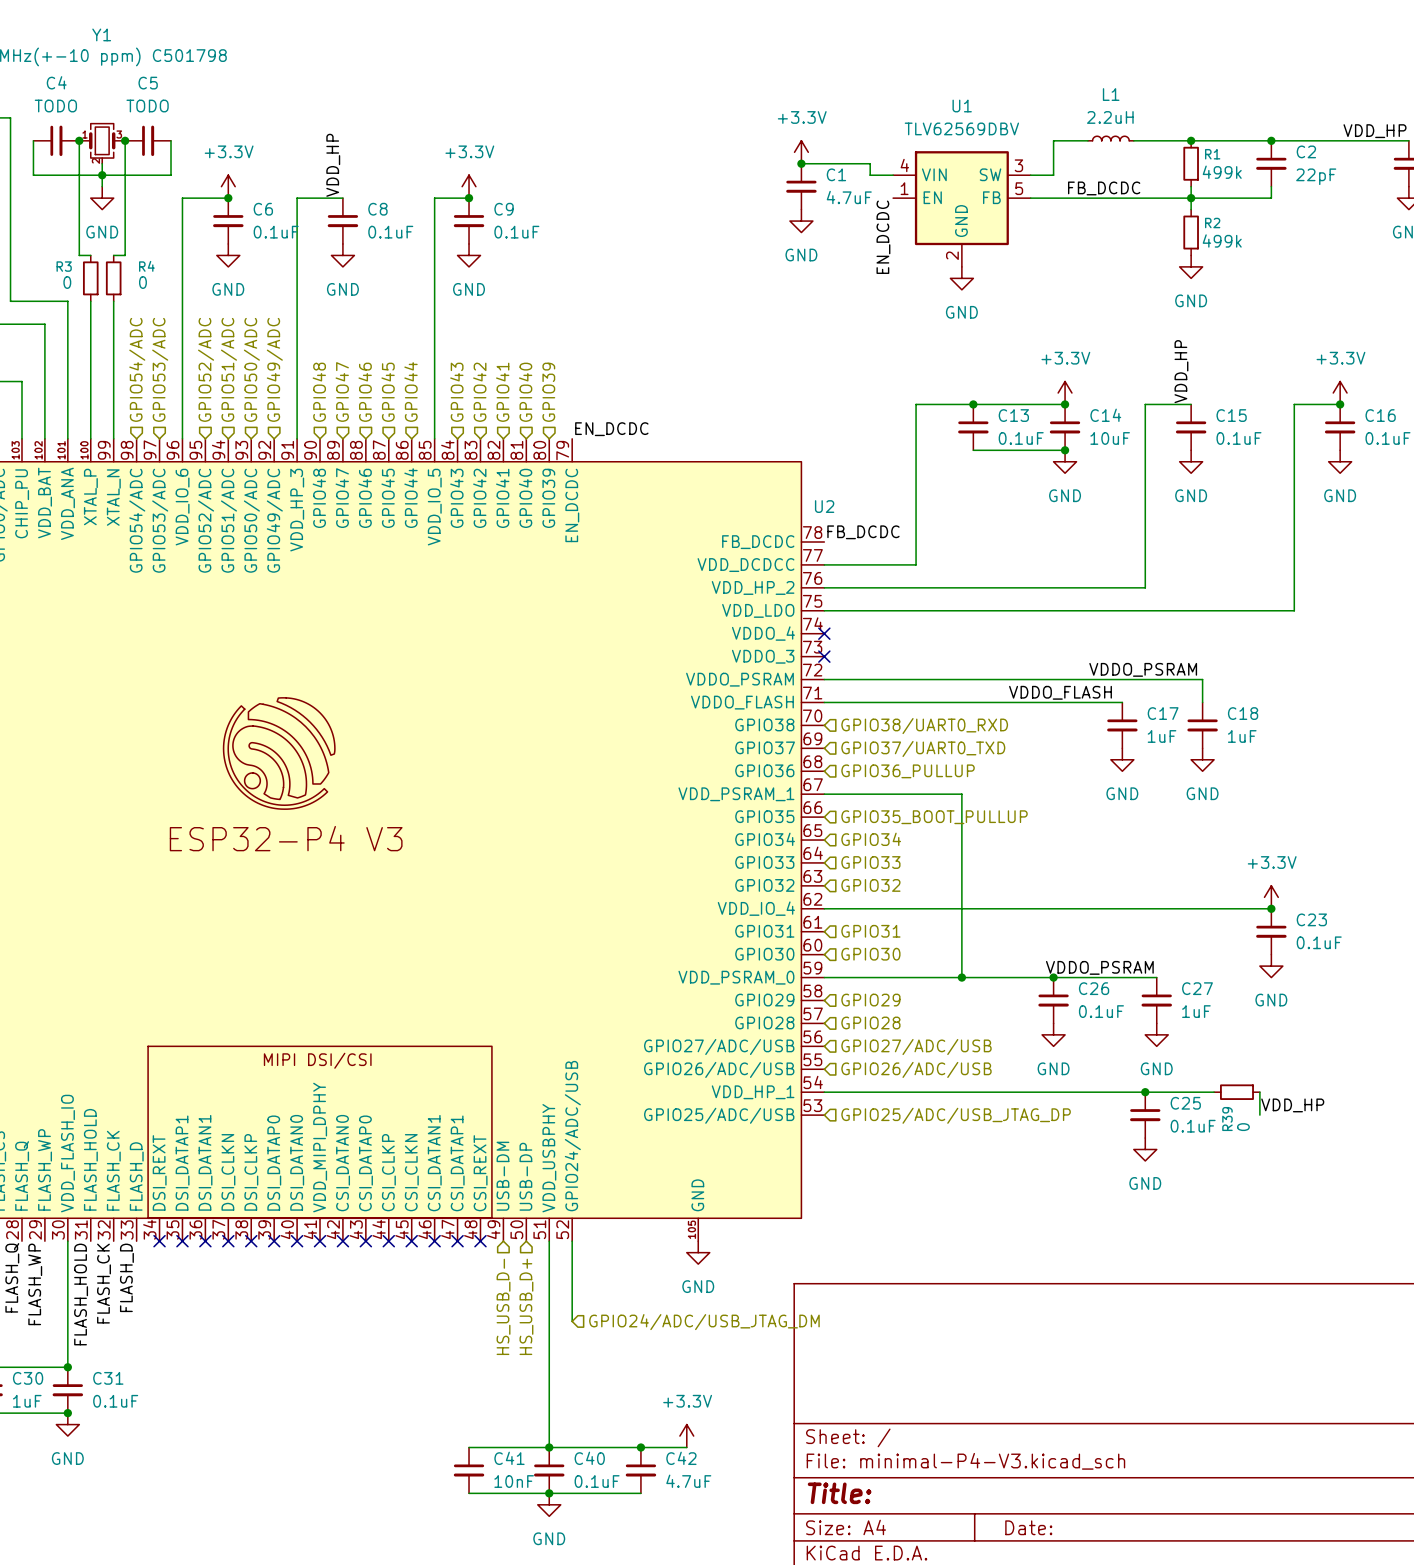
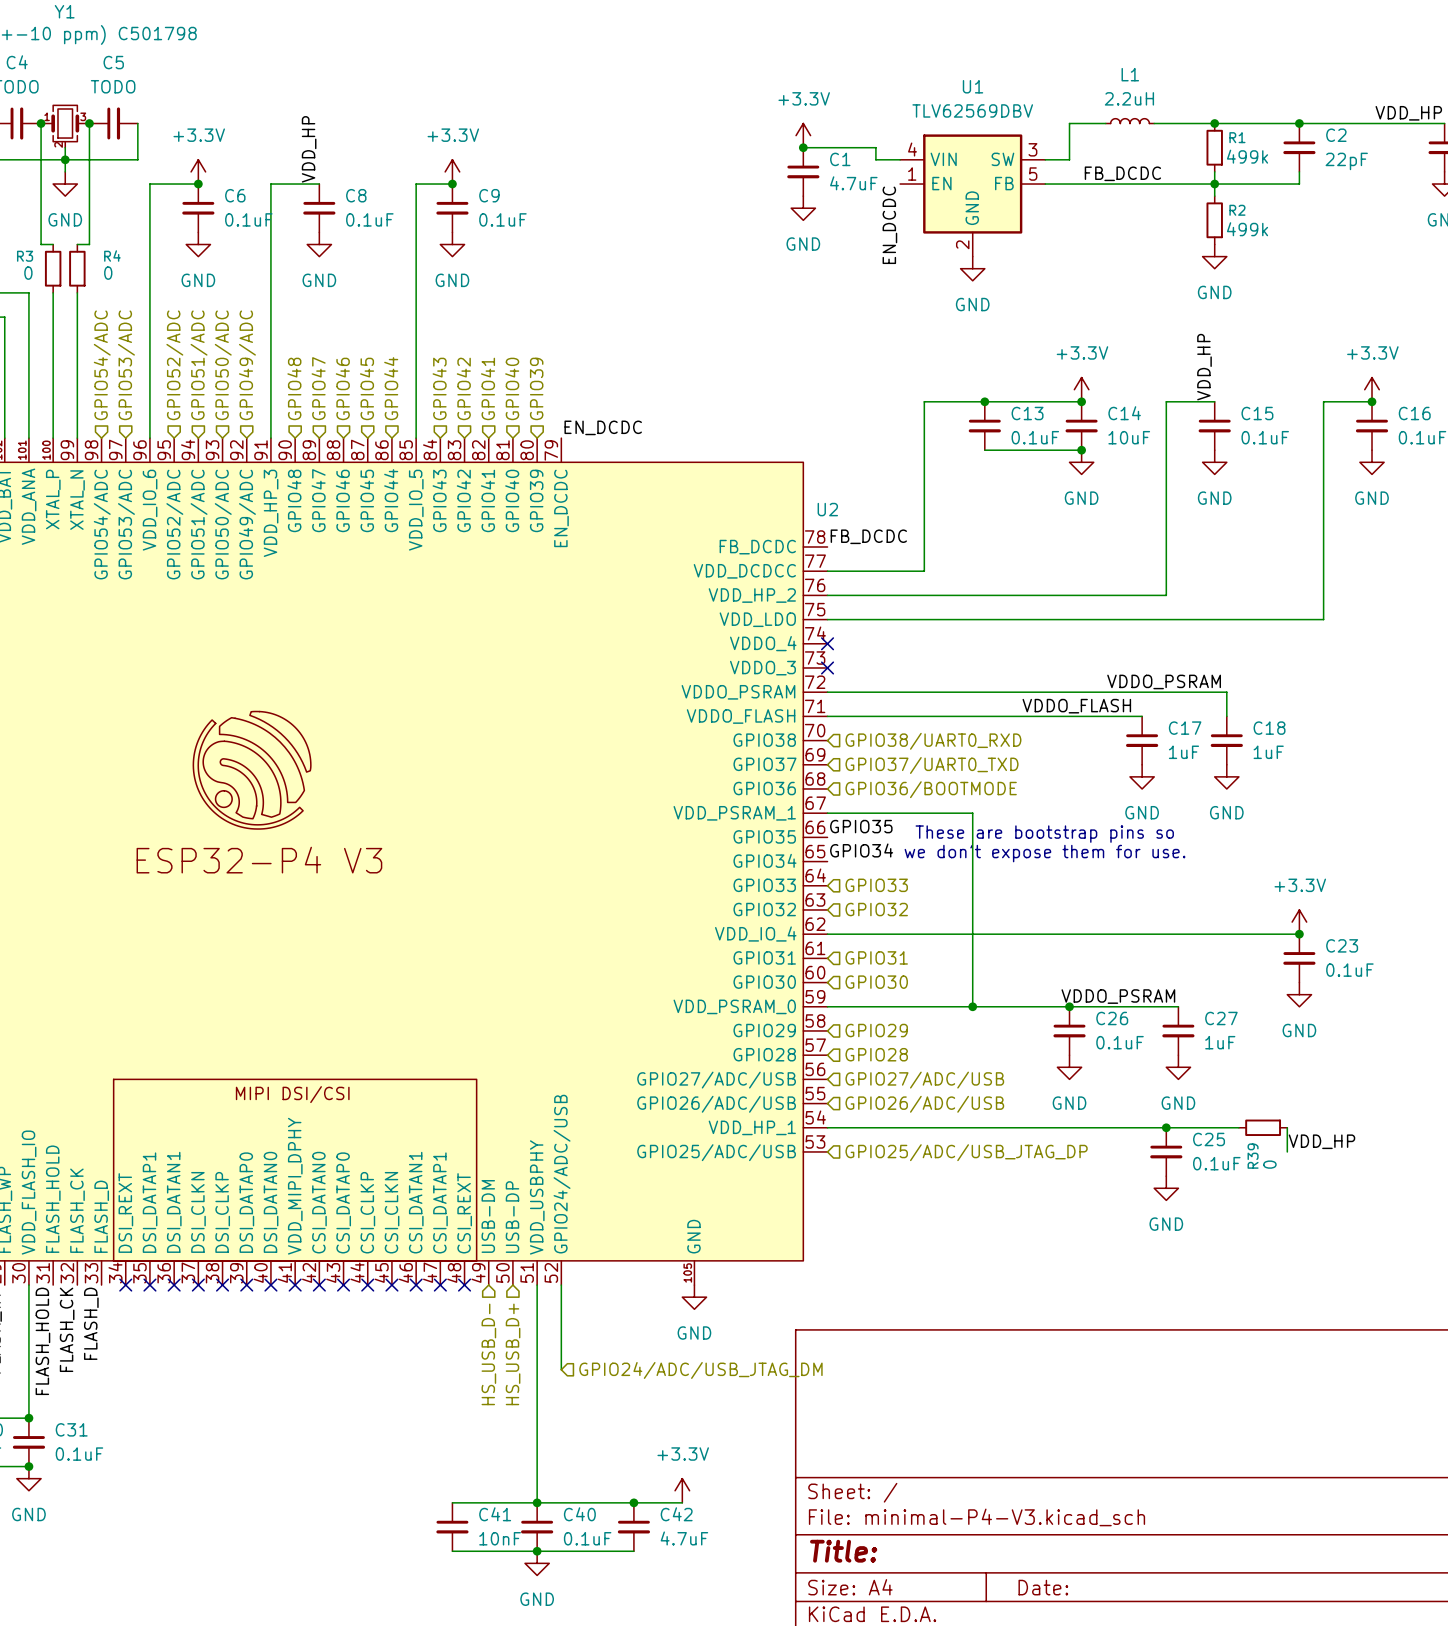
hierarchical label: GPIO36_PULLUP (908, 771) -> GPIO36/BOOTMODE (931, 789)
label: none -> GPIO35 (861, 826)
text: none -> These are bootstrap pins so (1044, 834)
hierarchical label: GPIO35_BOOT_PULLUP (934, 817) -> none
label: none -> GPIO34 (861, 850)
text: none -> we don't expose them for use. (1045, 853)
hierarchical label: GPIO34 (871, 839) -> none

